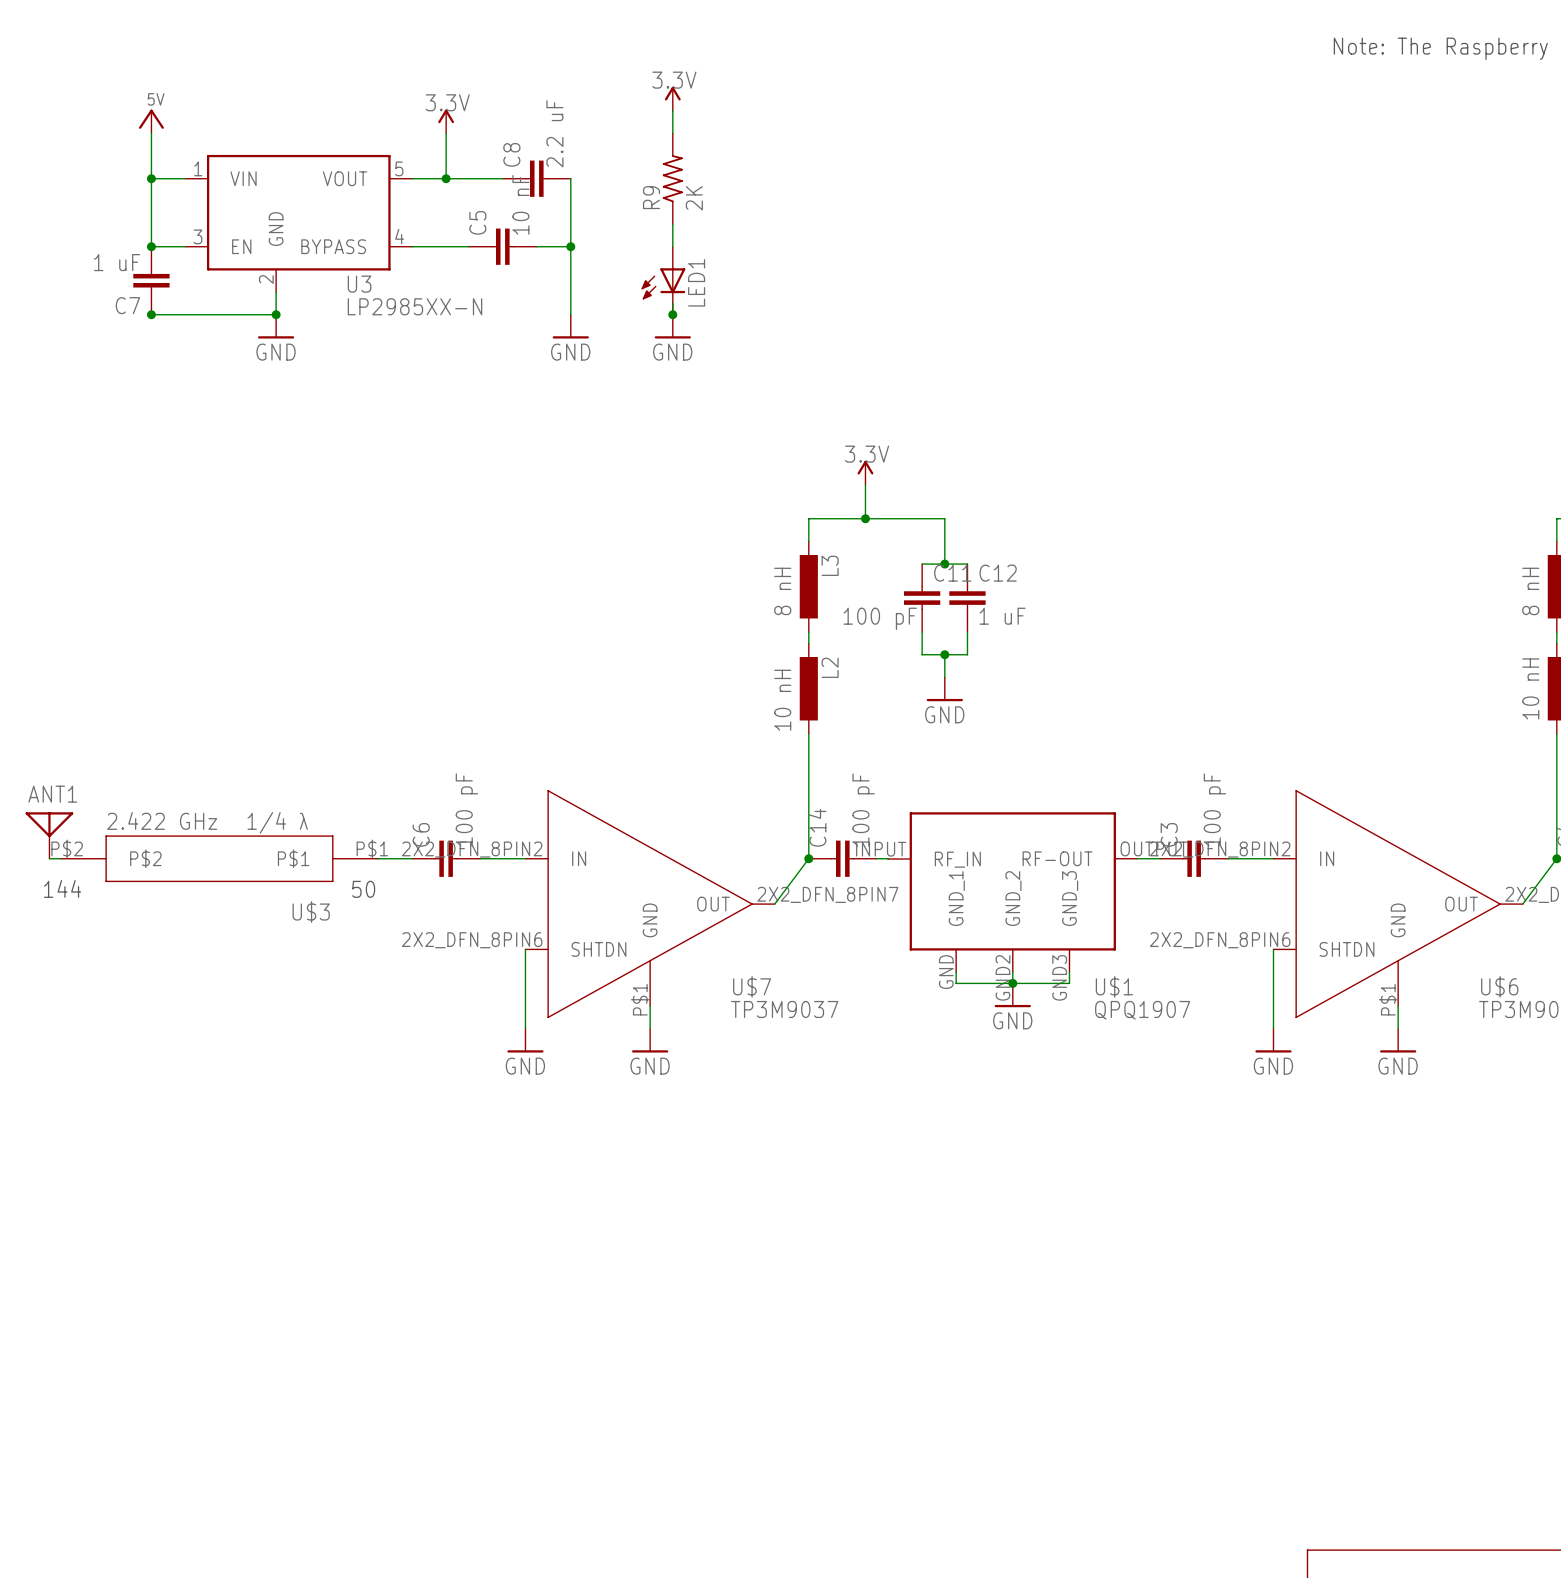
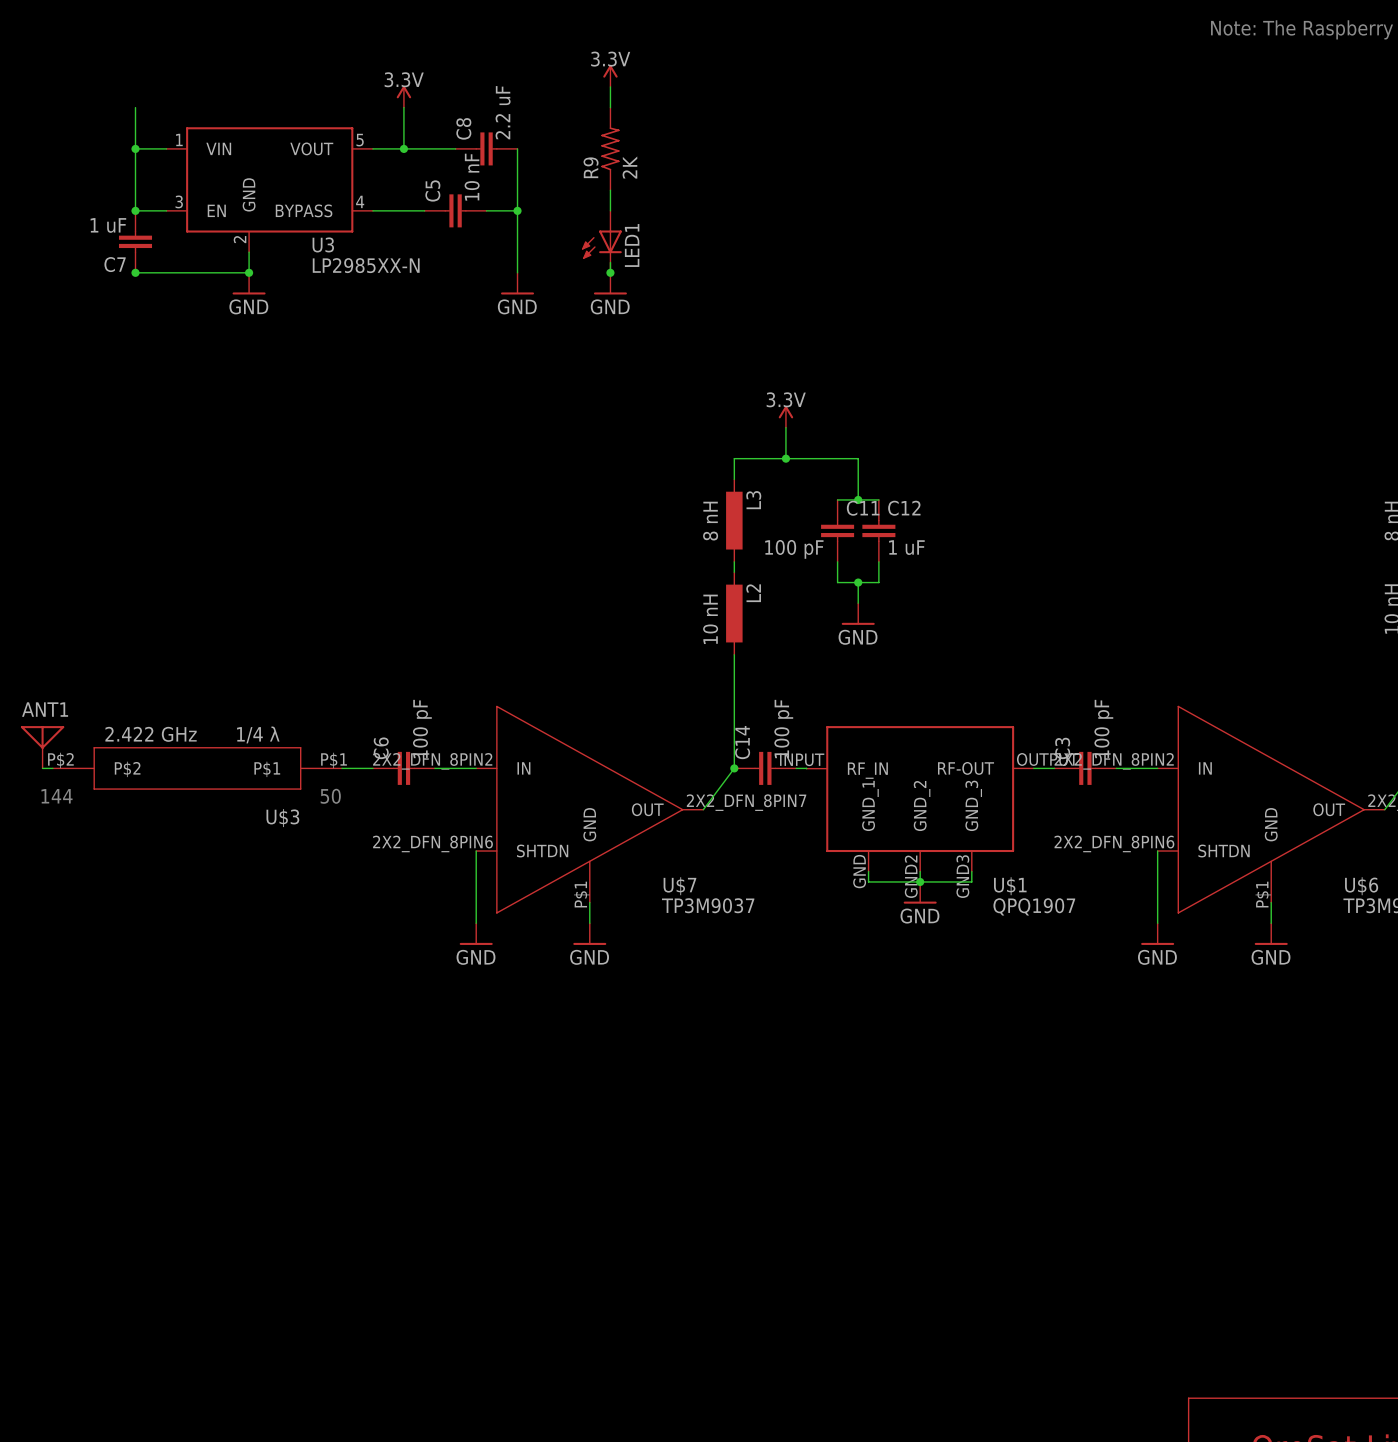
power symbol: 5V (151, 121) -> none

